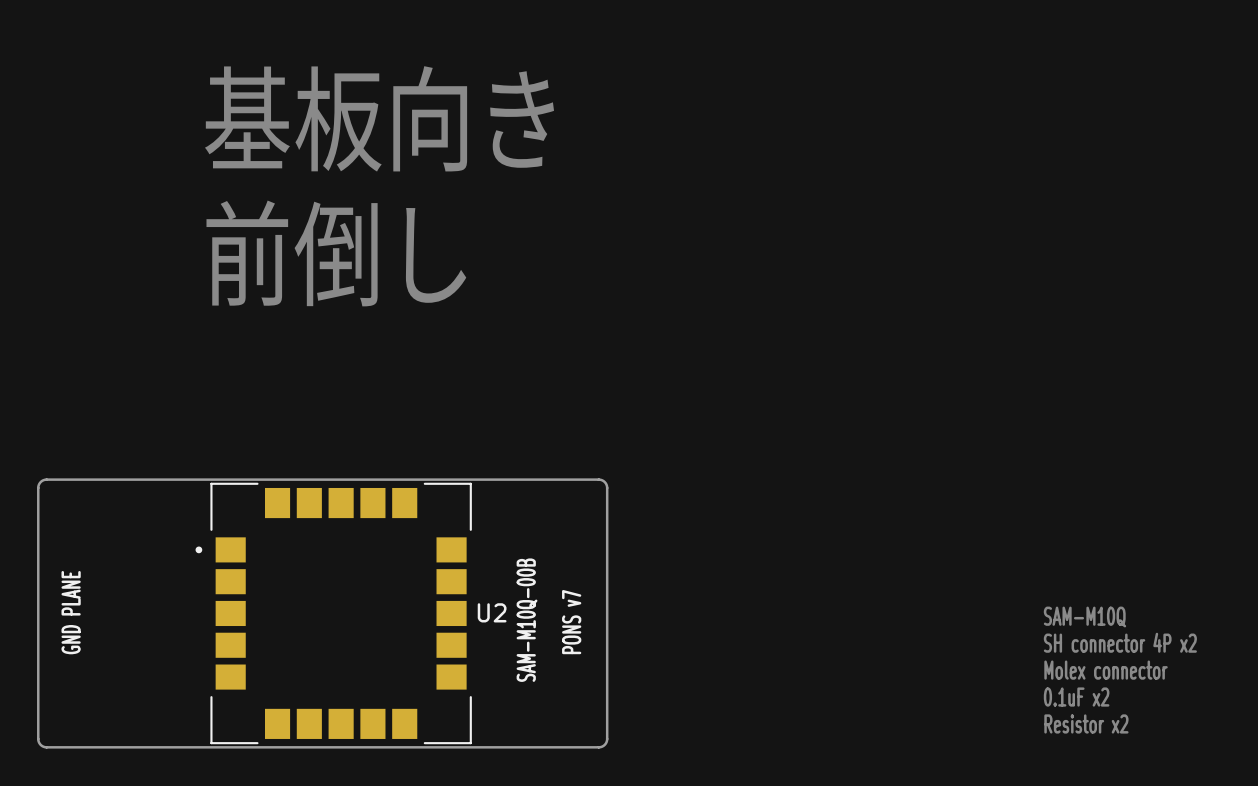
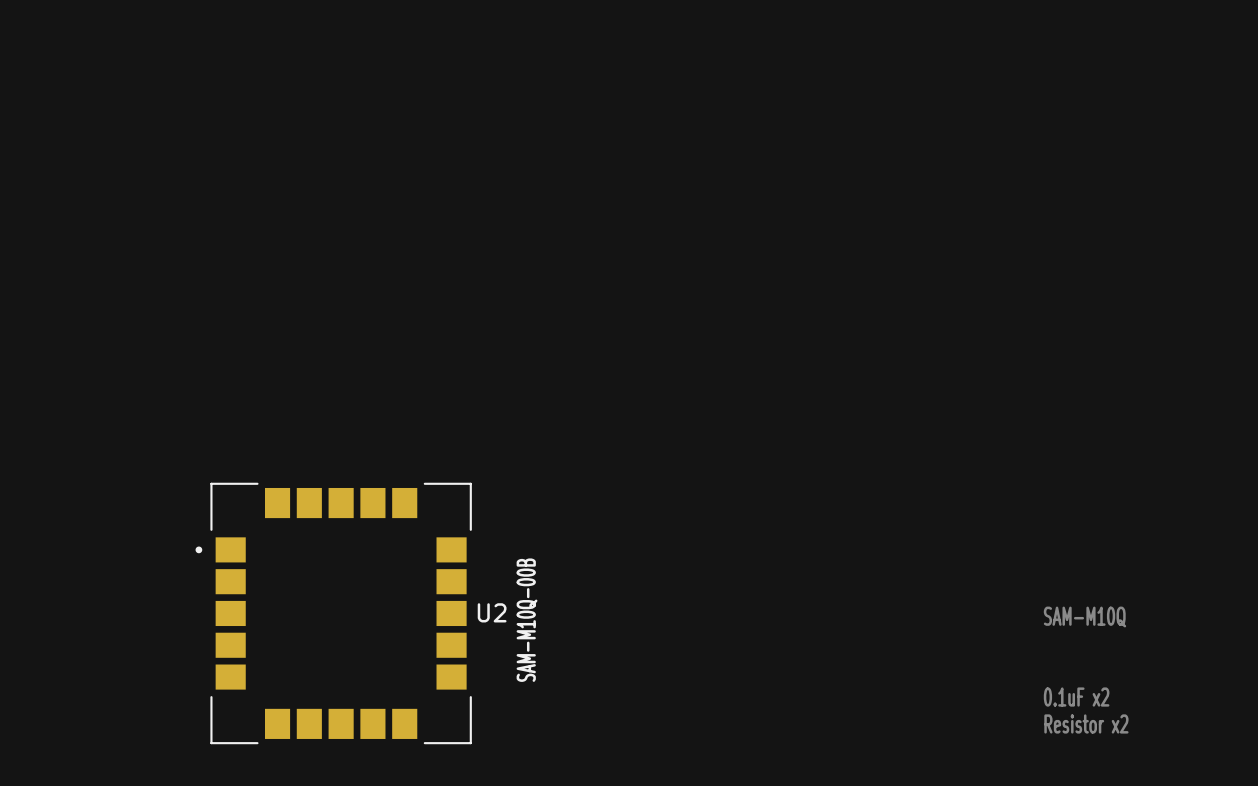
text: 基板向き (379, 118) -> none
text: 前倒し (336, 253) -> none
board edge: (46, 479) (602, 480) (607, 487) (606, 742) (598, 747) (43, 746) (38, 738) (38, 487) (40, 482) (46, 479) -> none
text: GND PLANE (71, 612) -> none
text: PONS v7 (571, 622) -> none
text: SH connector 4P x2 (1120, 642) -> none
text: Molex connector (1106, 670) -> none

